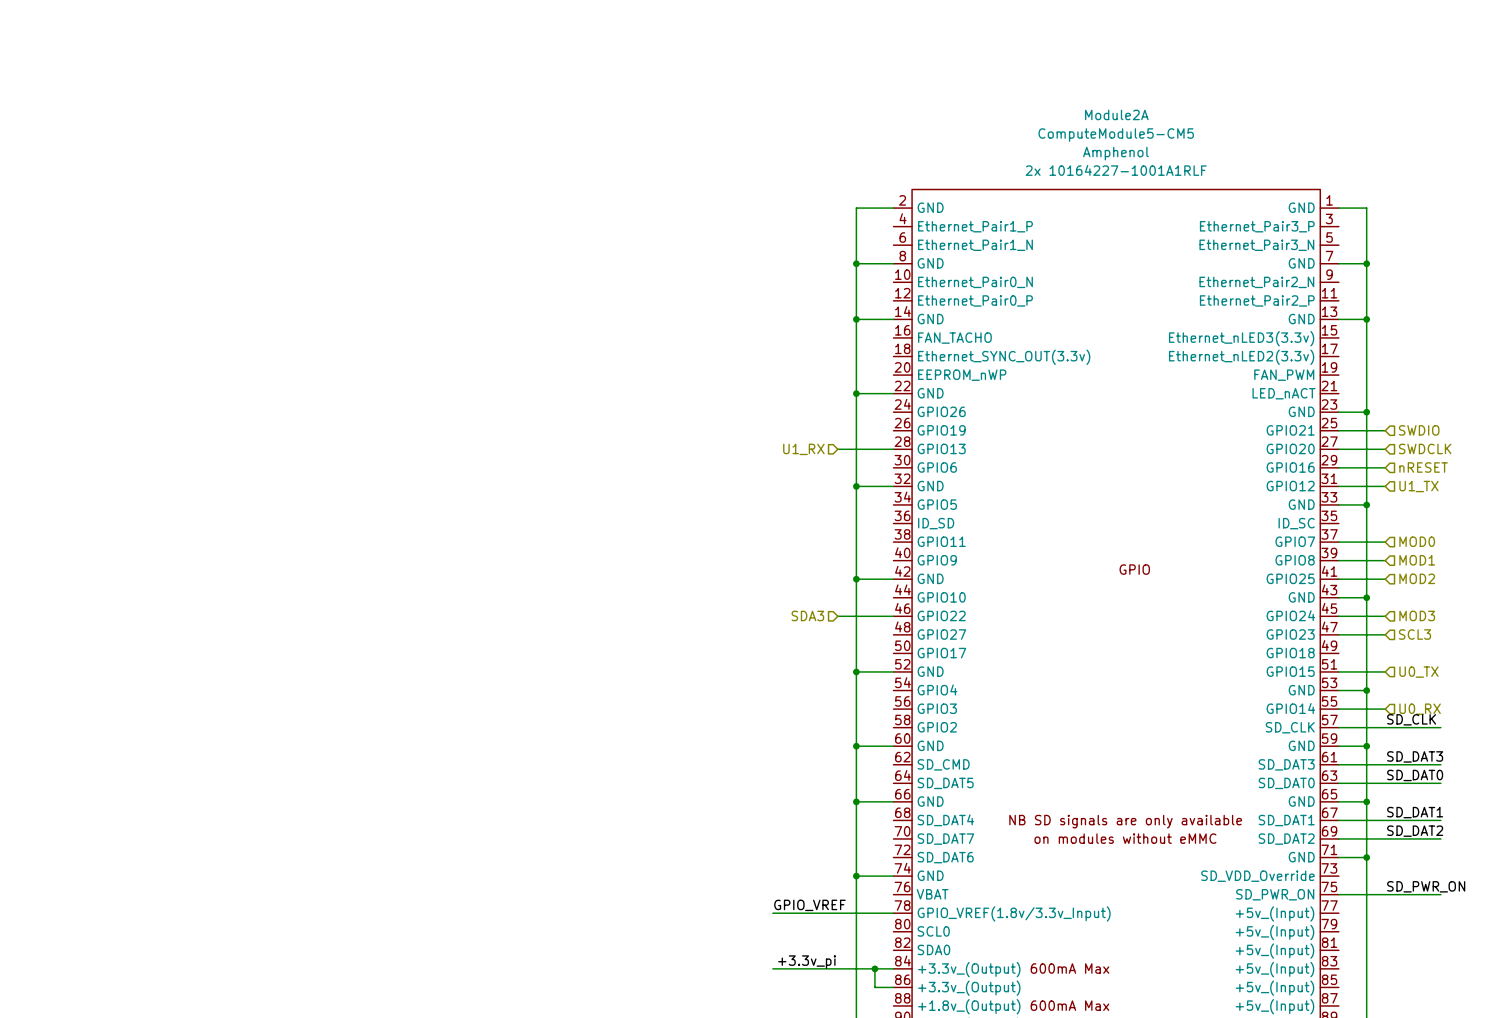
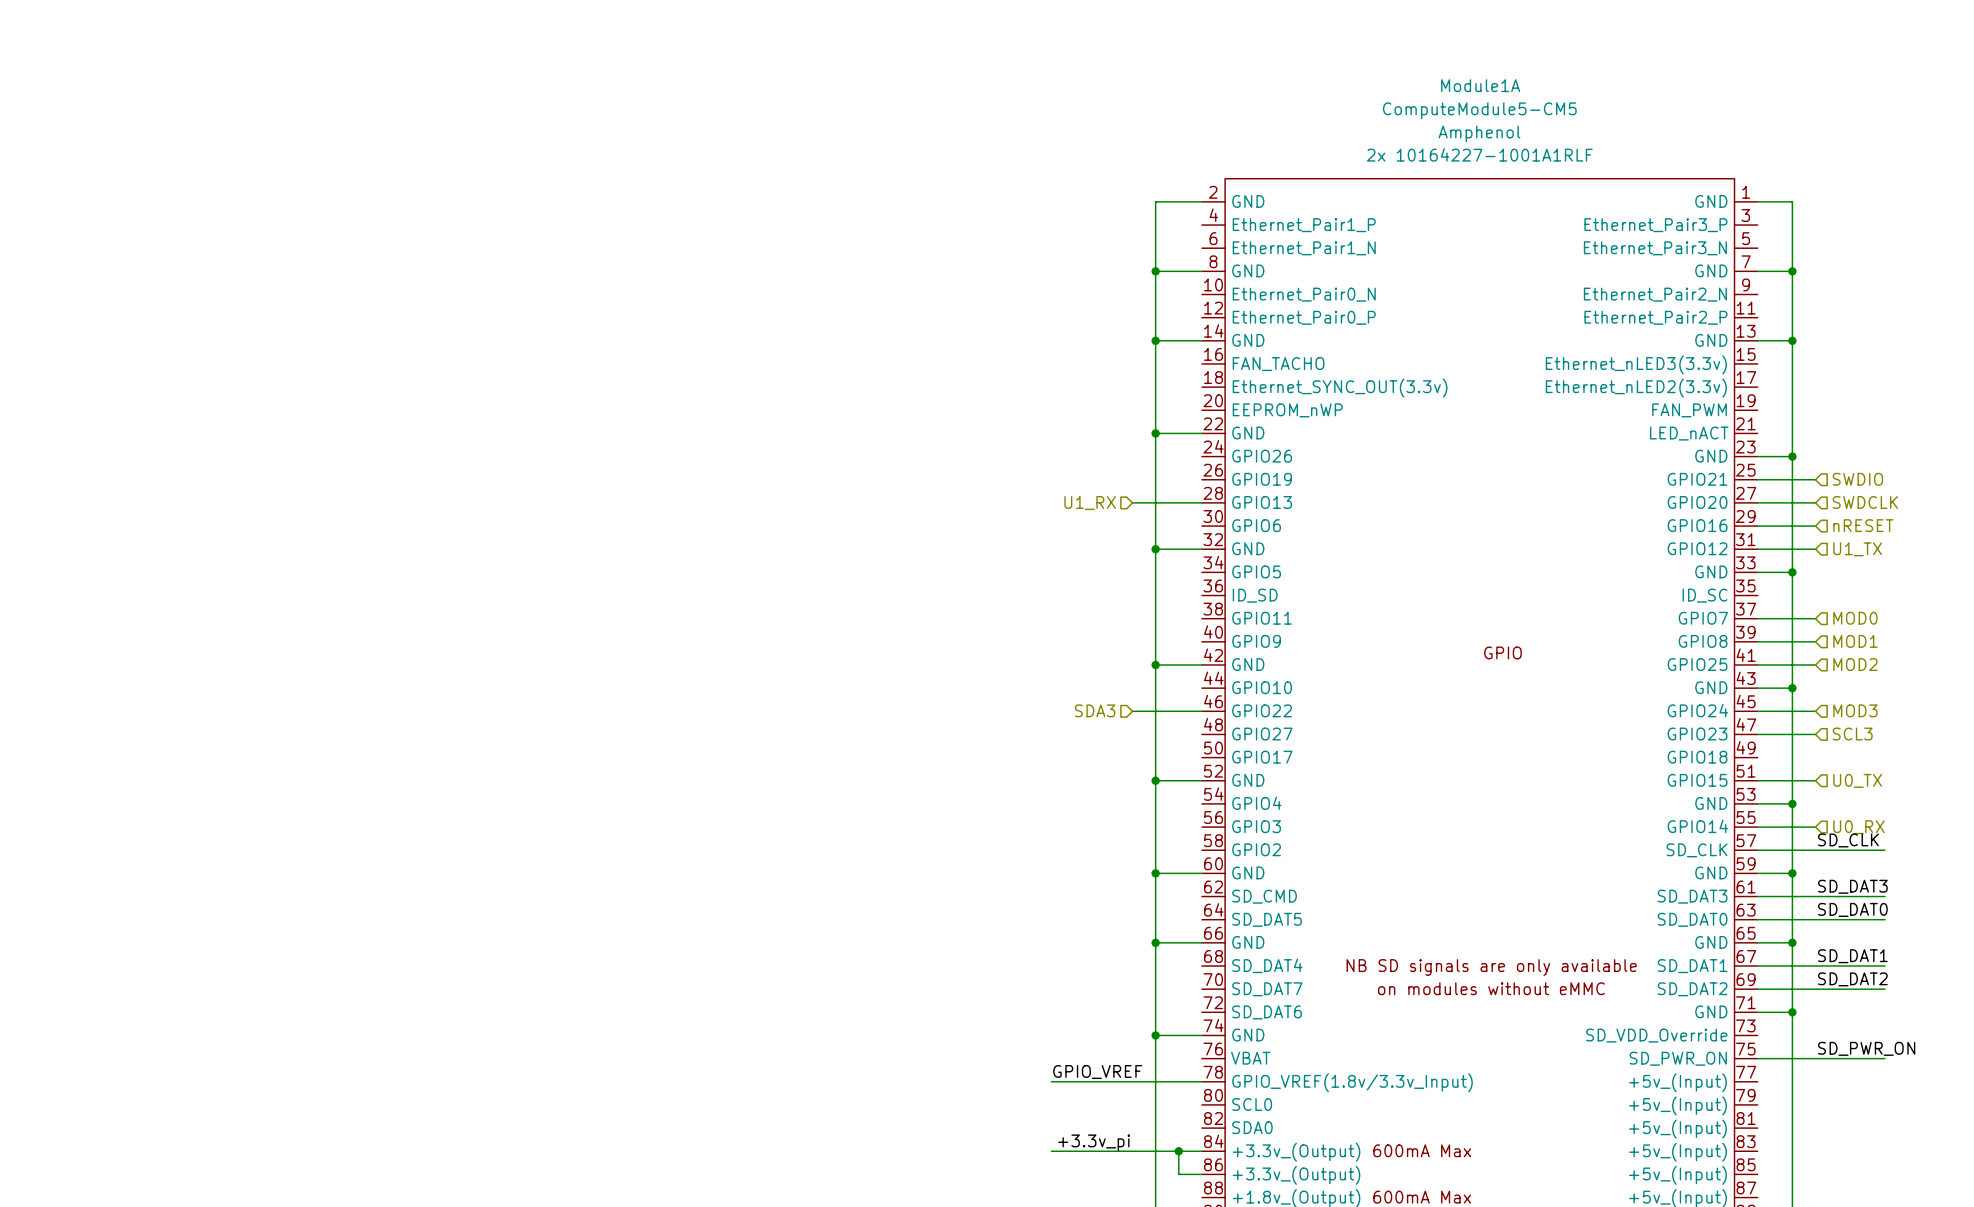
Module2A name: Module2A (1116, 114) -> Module1A (1480, 85)

